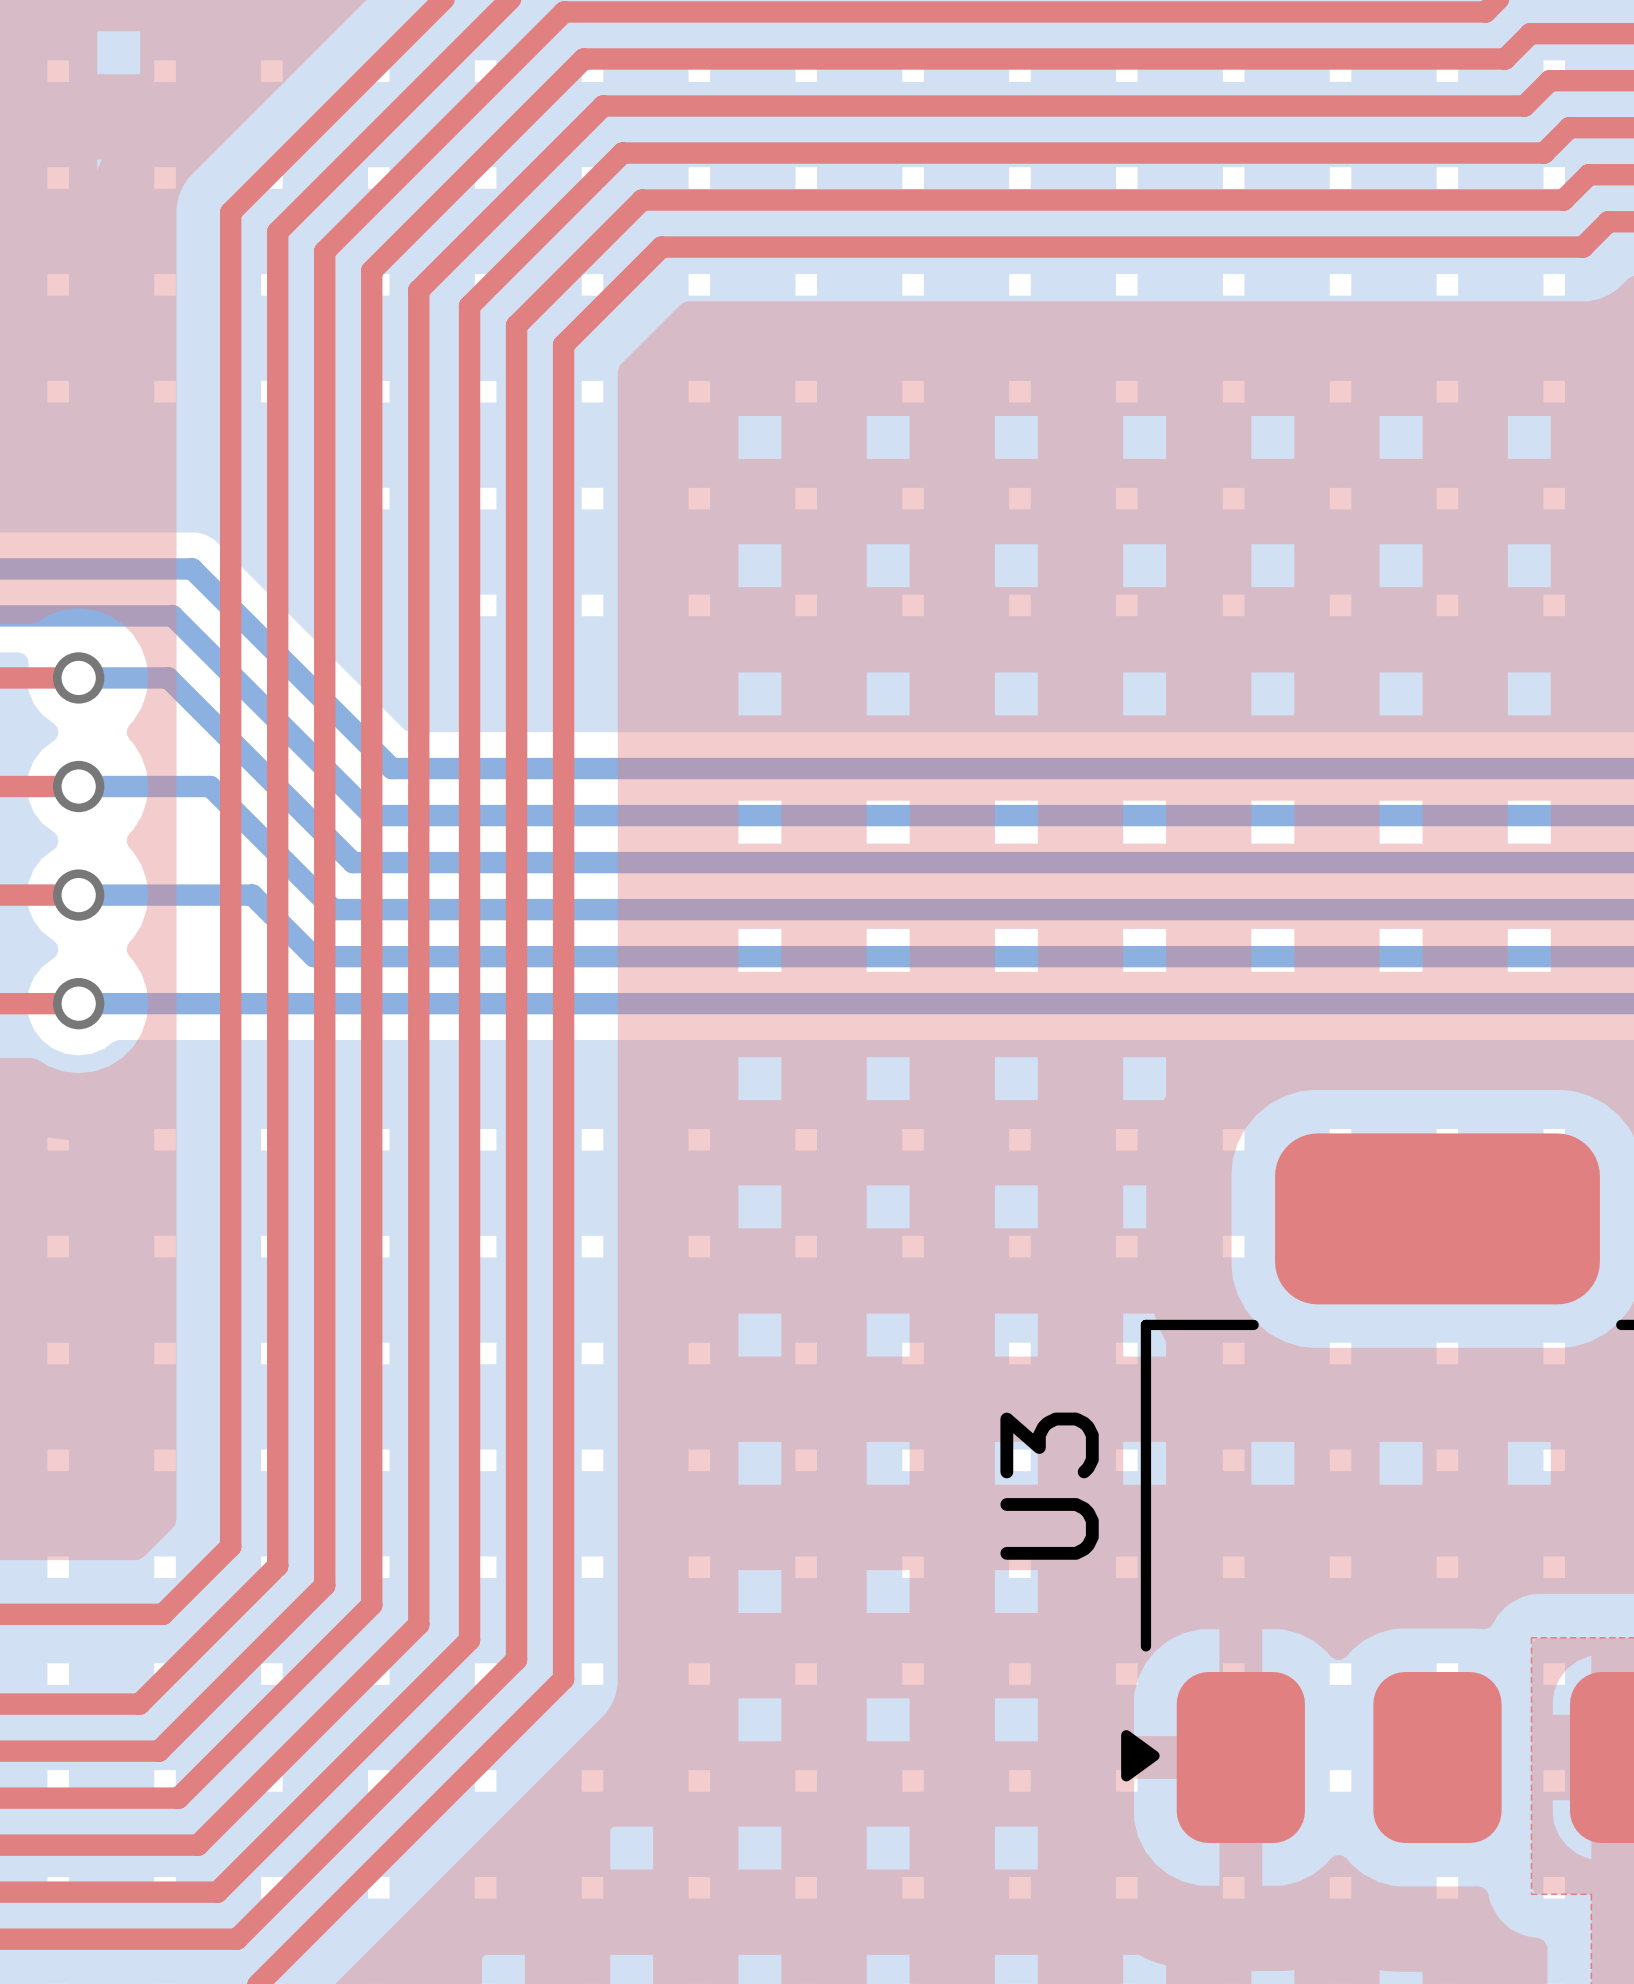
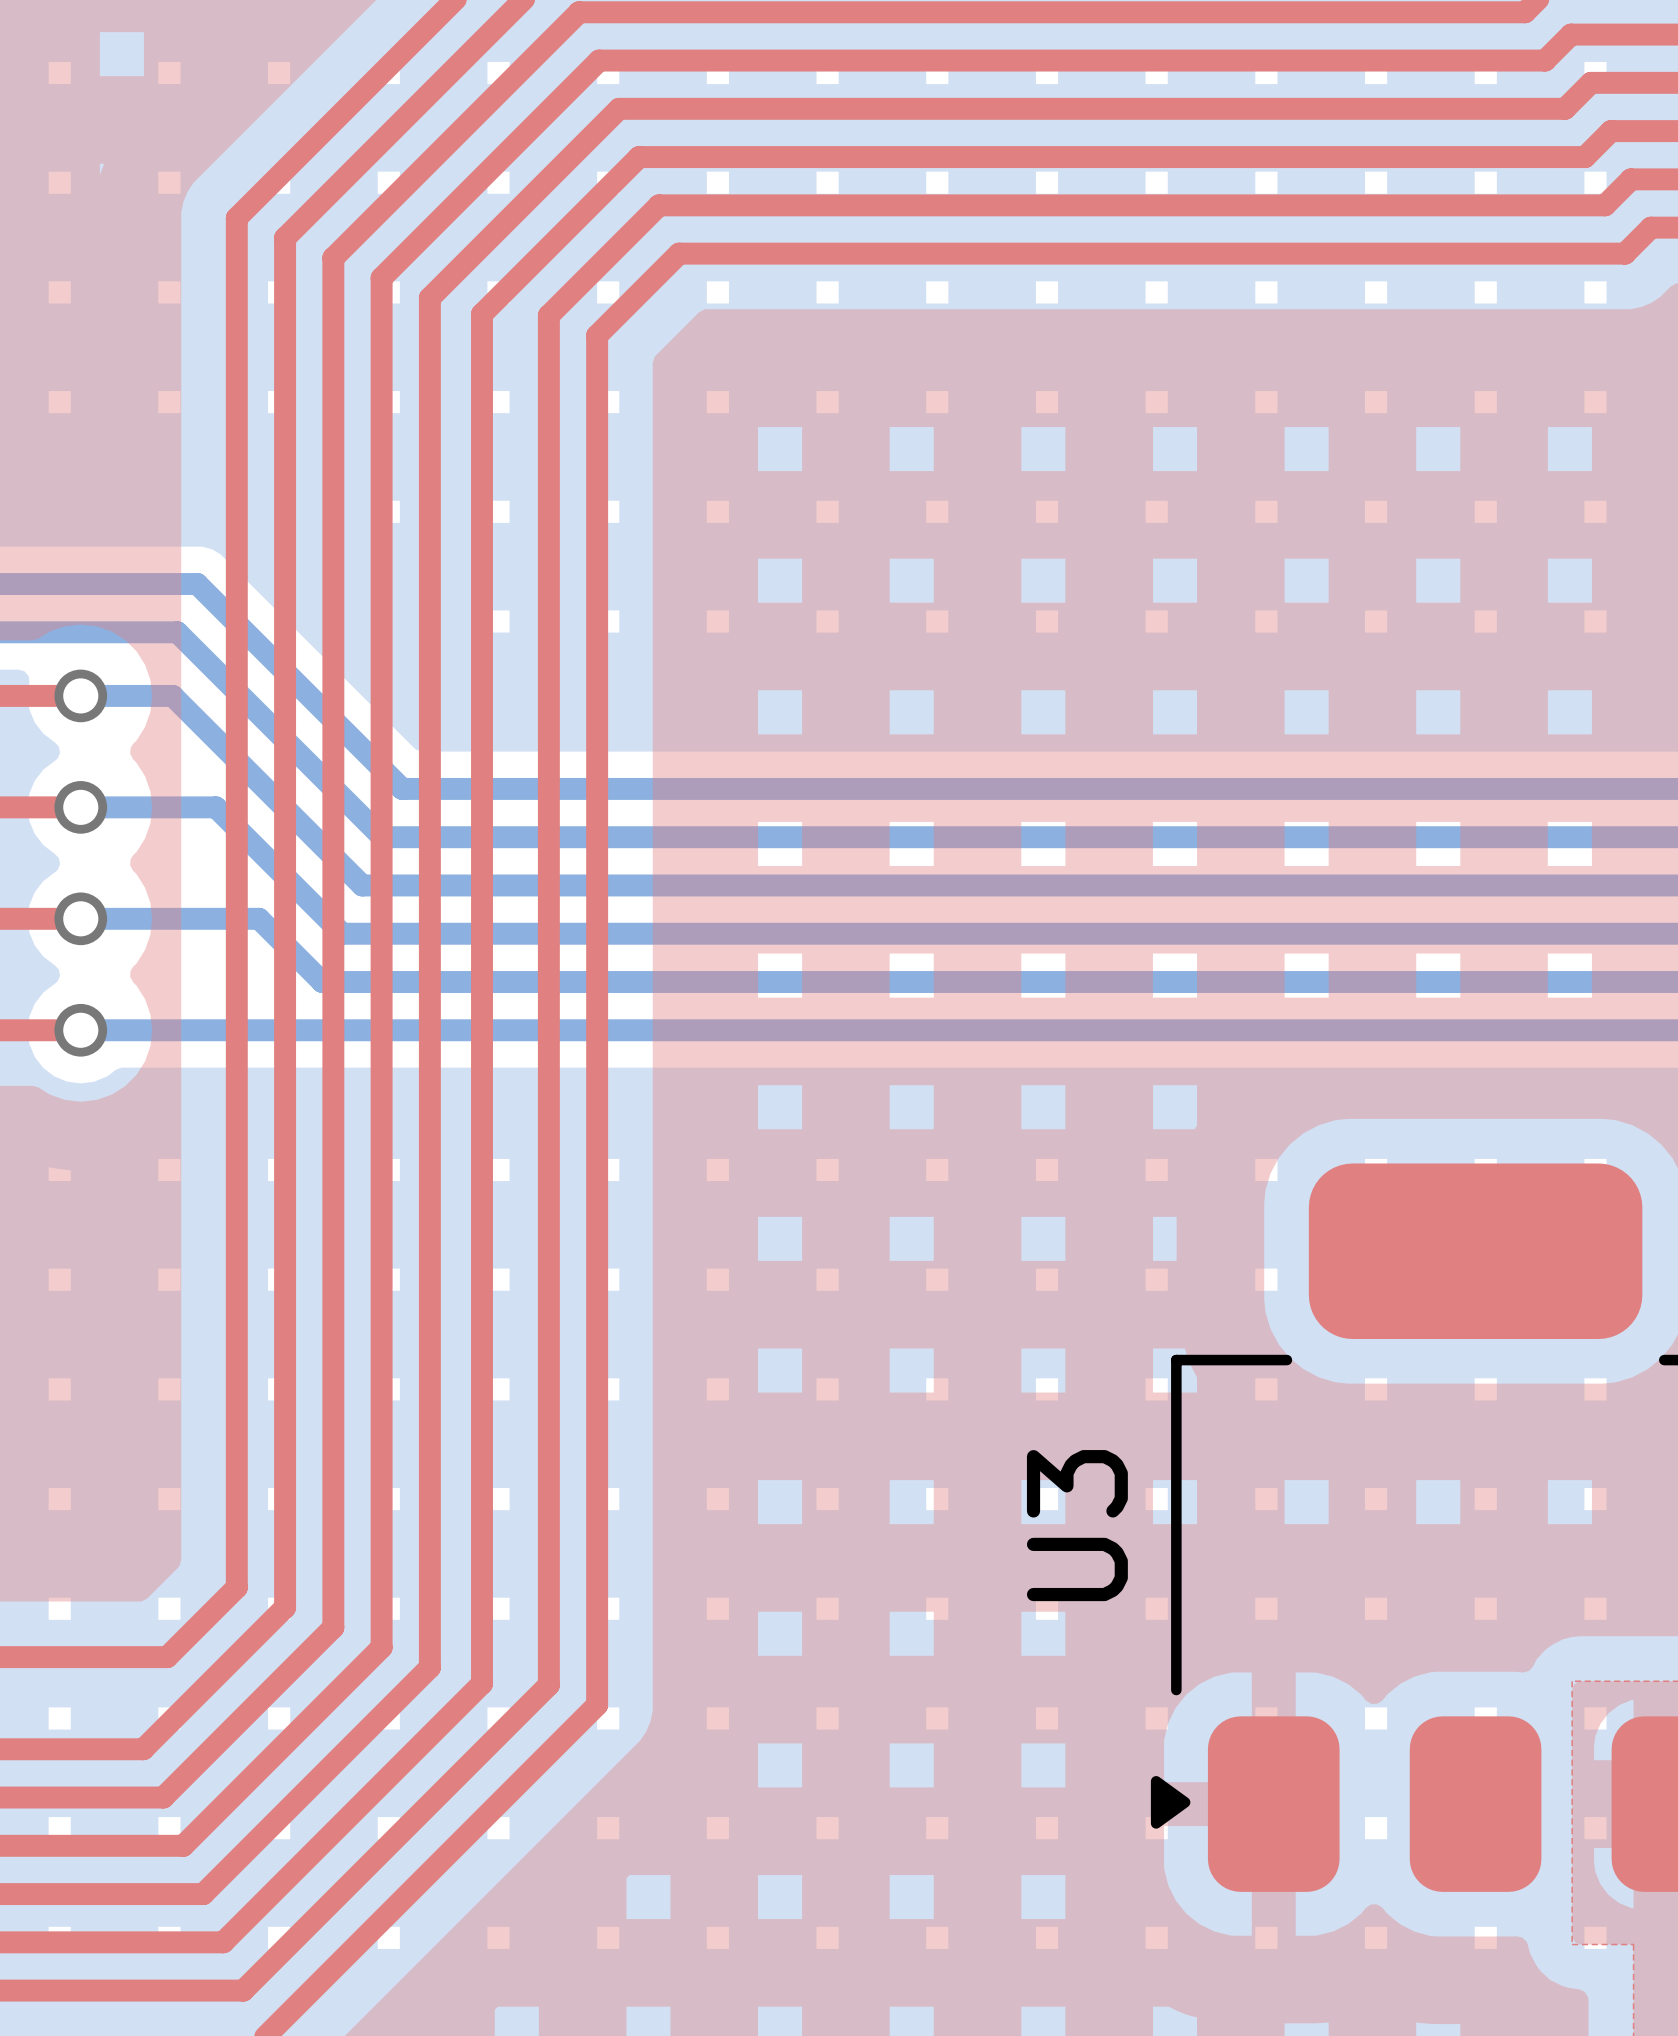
top track: (534, 307) (516, 325) (516, 1659) -> (548, 315) (548, 1685) (530, 1703)
top track: (581, 326) (563, 345) (563, 1679) -> (597, 335) (597, 1705) (578, 1723)

